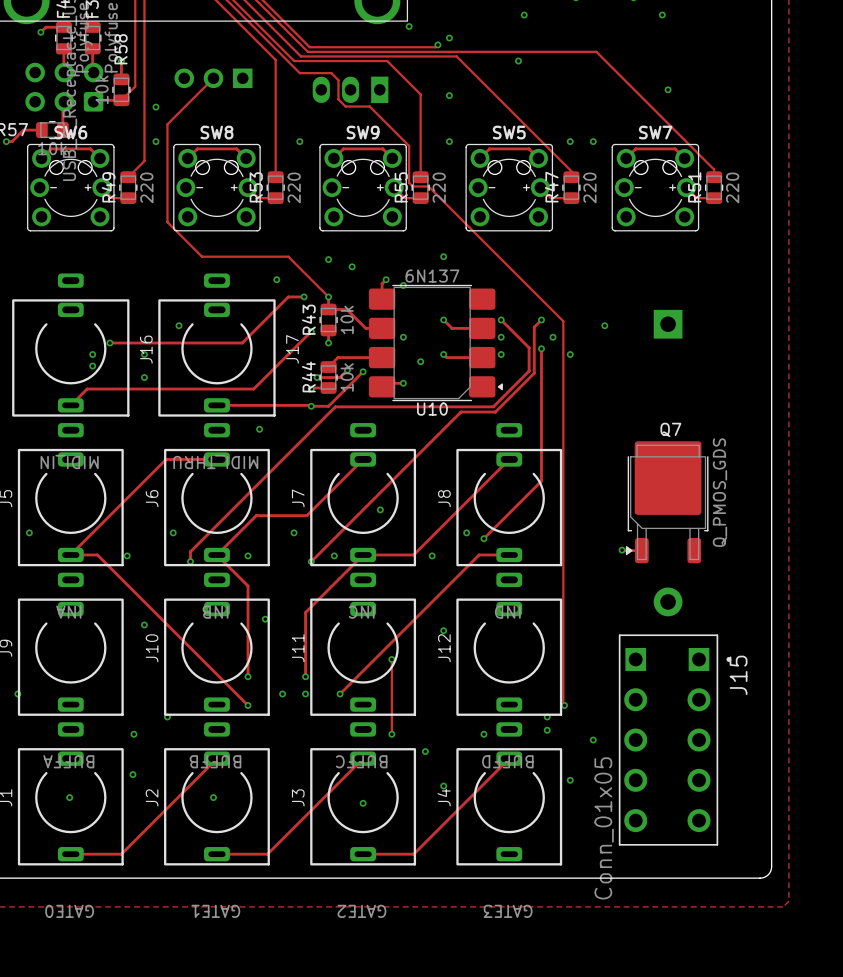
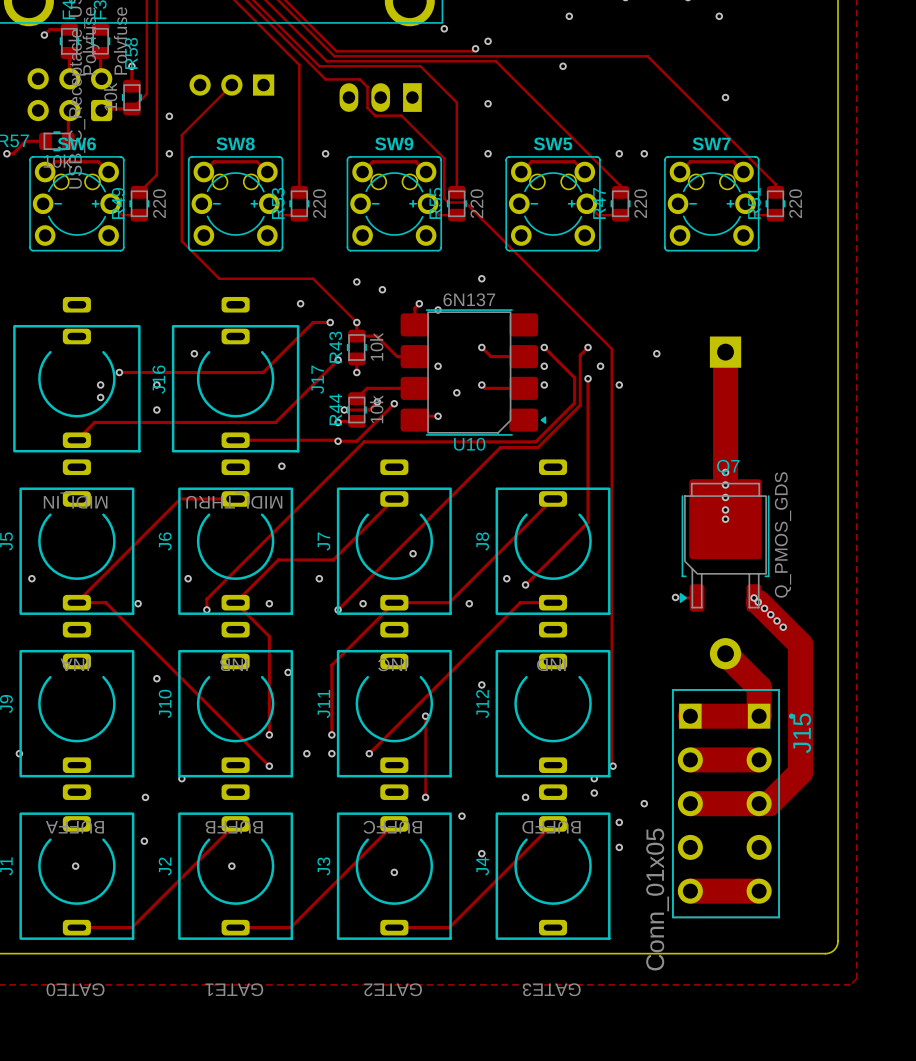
track: none -> (725, 352) (725, 519)
via: none -> (725, 472)
via: none -> (725, 484)
via: none -> (725, 497)
via: none -> (725, 509)
via: none -> (725, 519)
via: none -> (754, 597)
track: none -> (758, 602) (800, 644) (800, 772) (769, 803) (690, 803)
via: none -> (758, 602)
via: none -> (764, 608)
via: none -> (770, 614)
via: none -> (777, 620)
via: none -> (783, 627)
track: none -> (725, 653) (759, 687) (759, 716) (690, 716)
track: none -> (690, 759) (759, 759)
via: none -> (619, 822)
track: none -> (690, 891) (759, 891)

